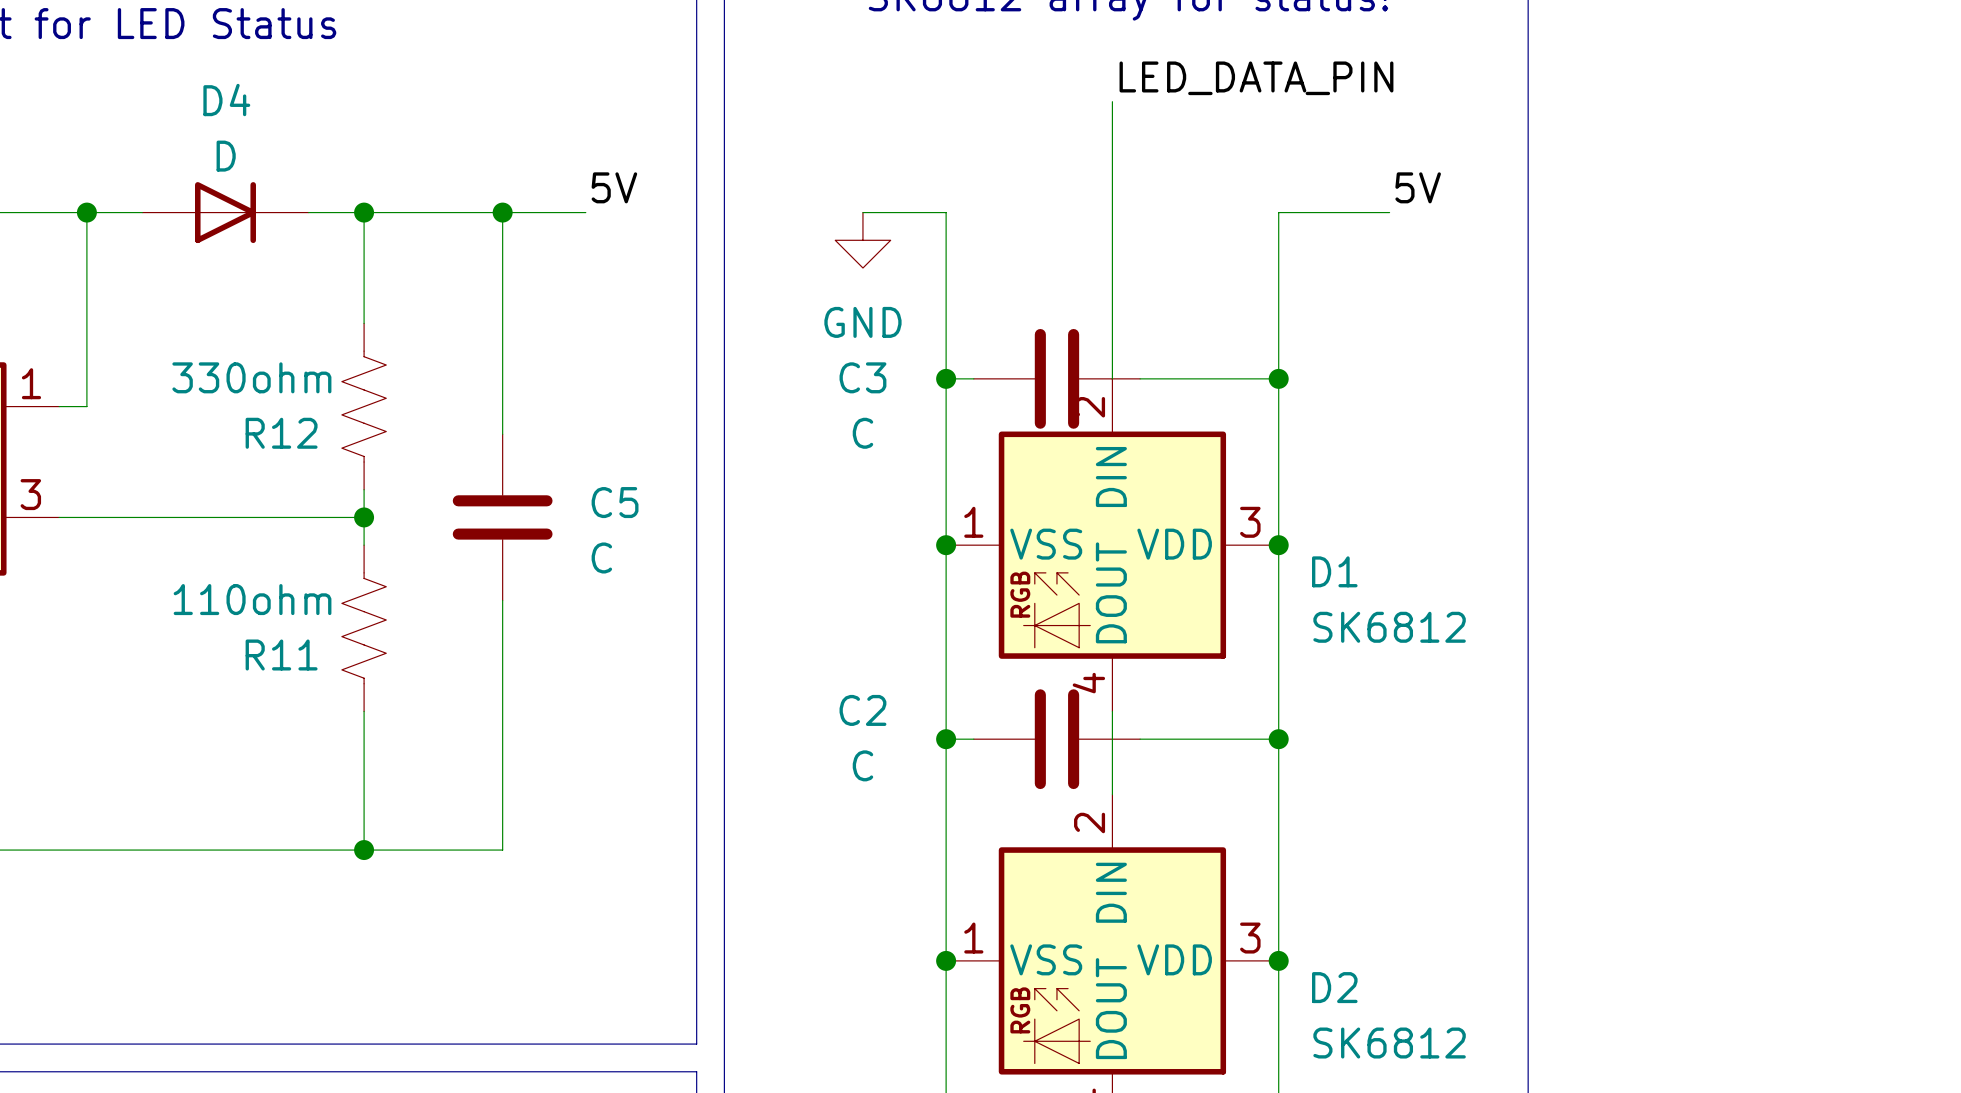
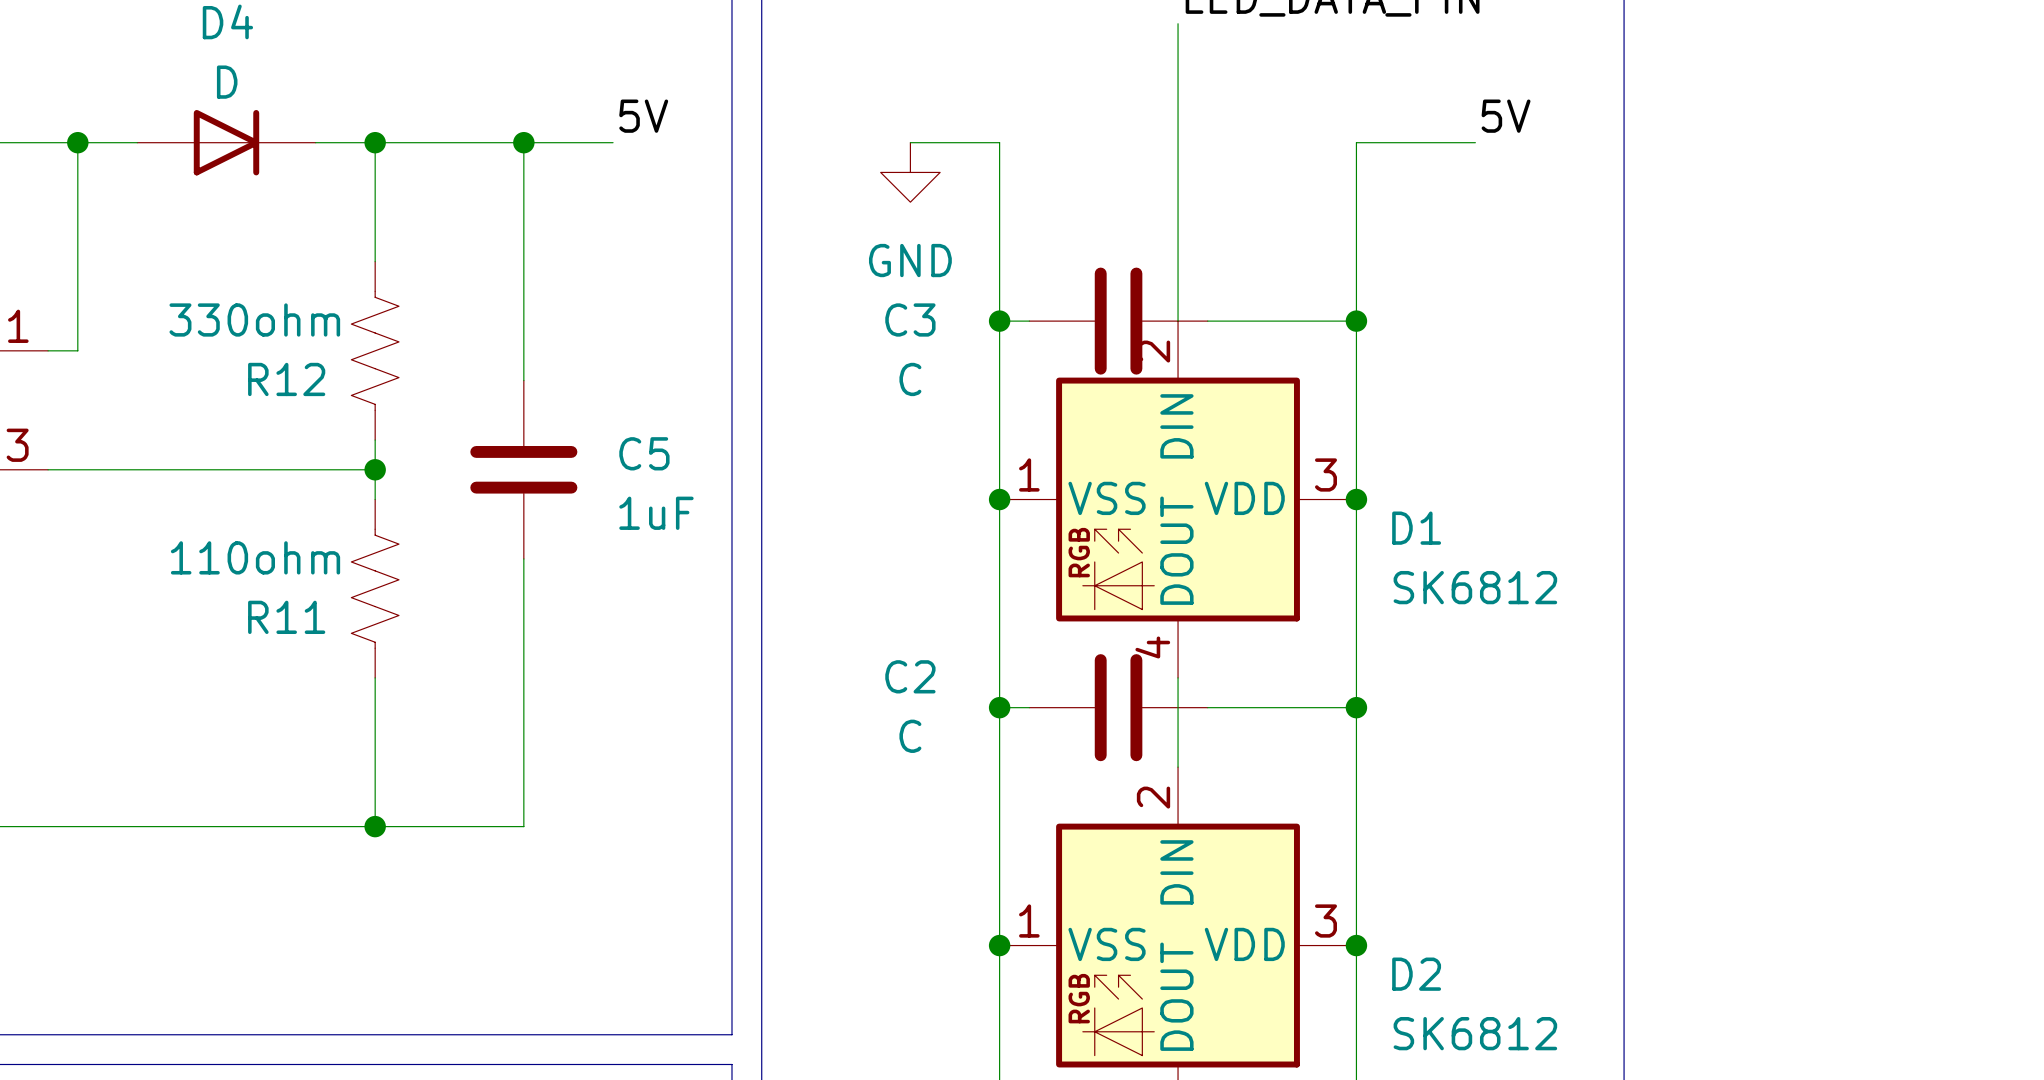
C5 value: C (601, 557) -> 1uF (656, 513)

